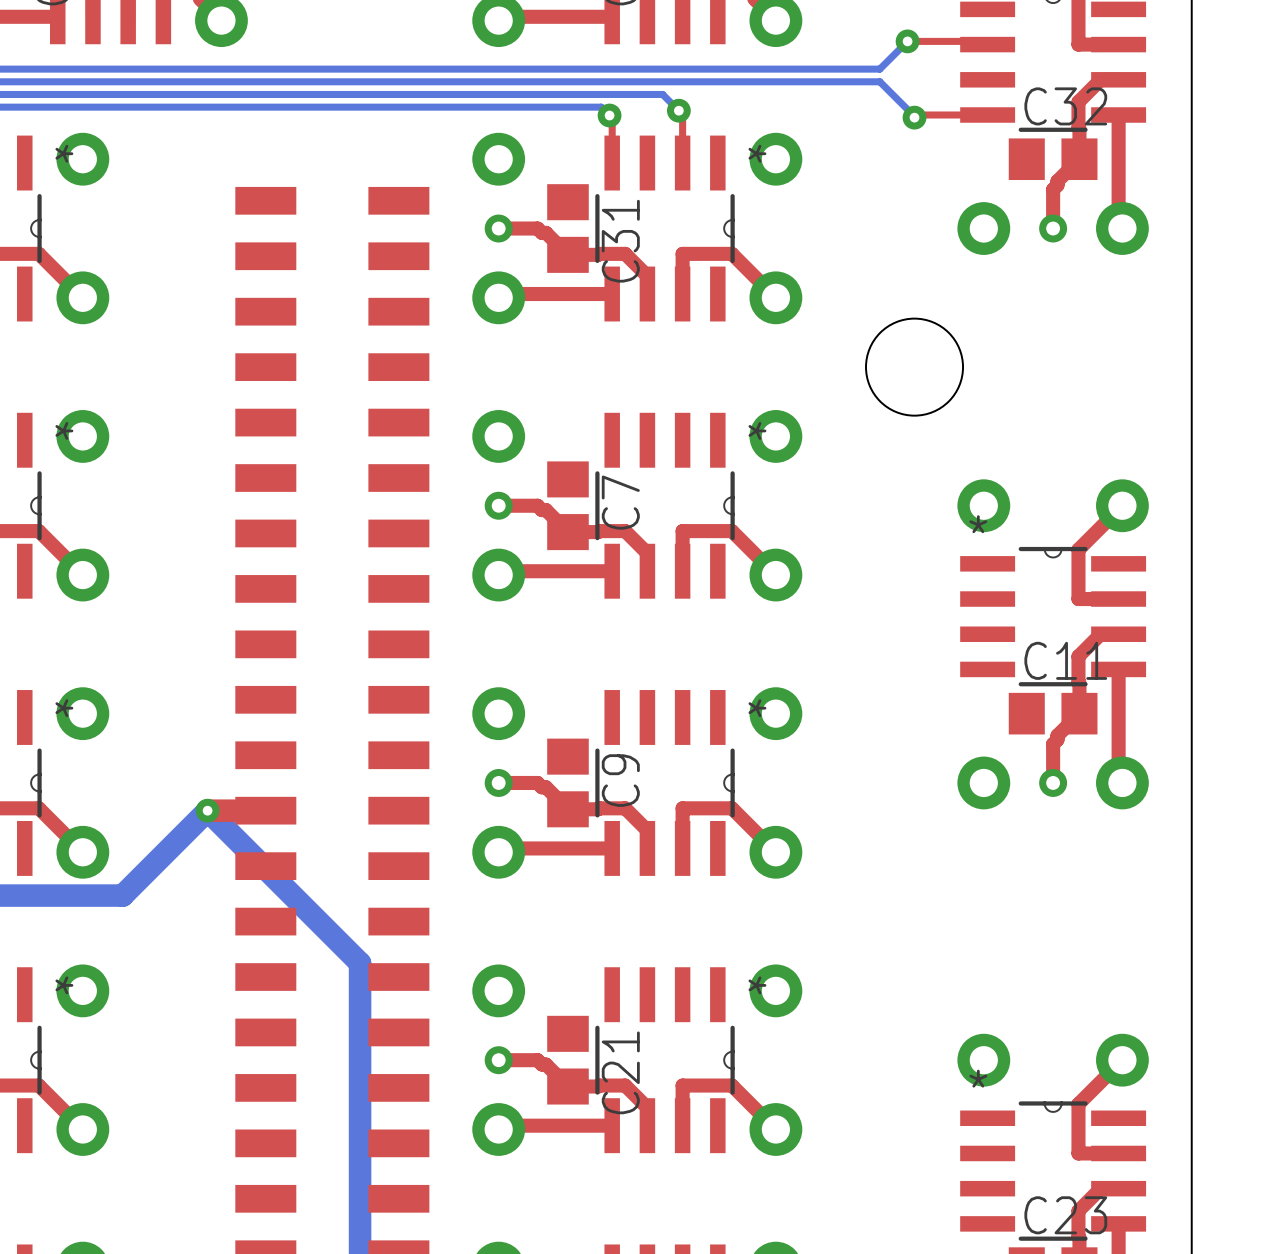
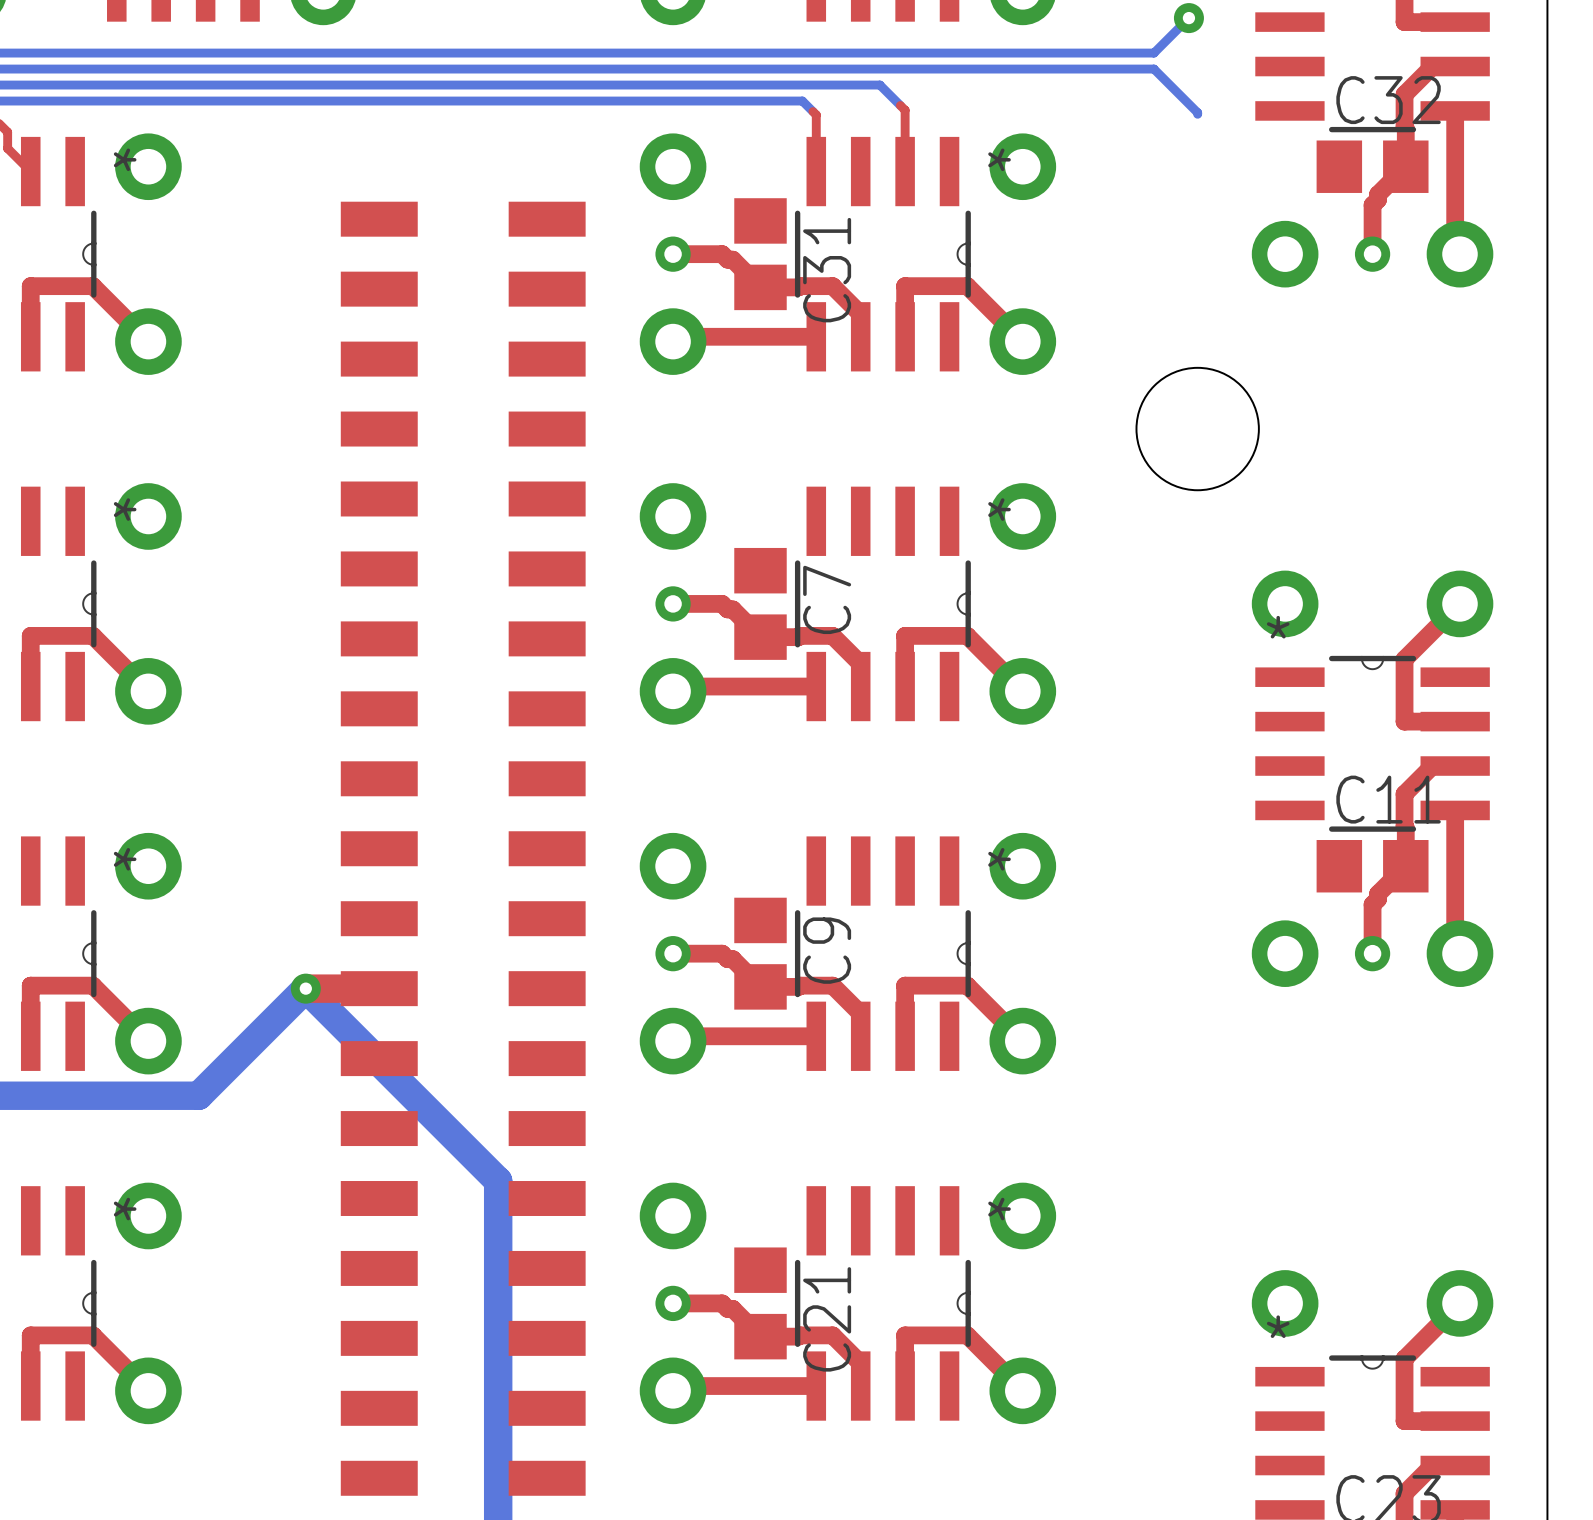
top track: (907, 41) (984, 41) (987, 44) -> none
via: (678, 110) -> none
via: (609, 115) -> none
top track: (987, 115) (917, 115) (914, 117) -> none
via: (914, 117) -> none

